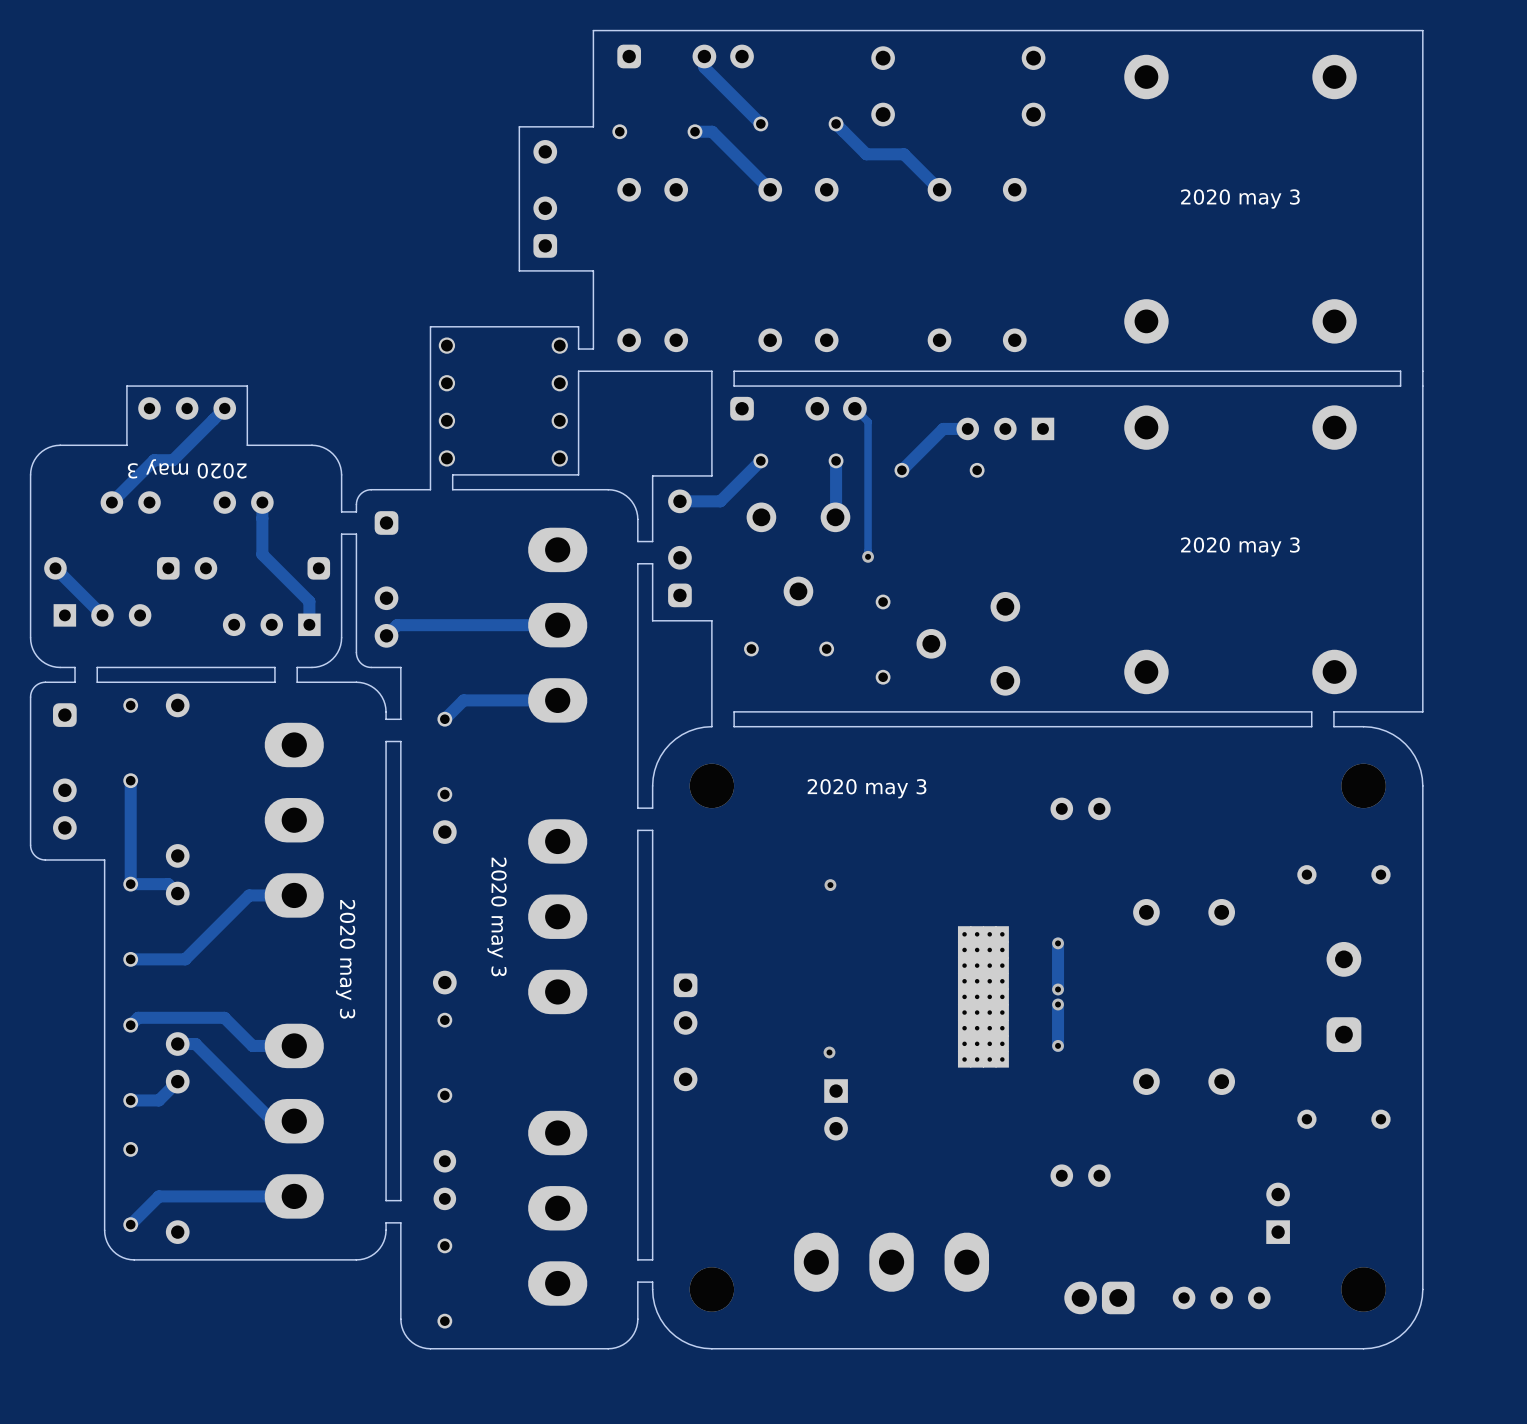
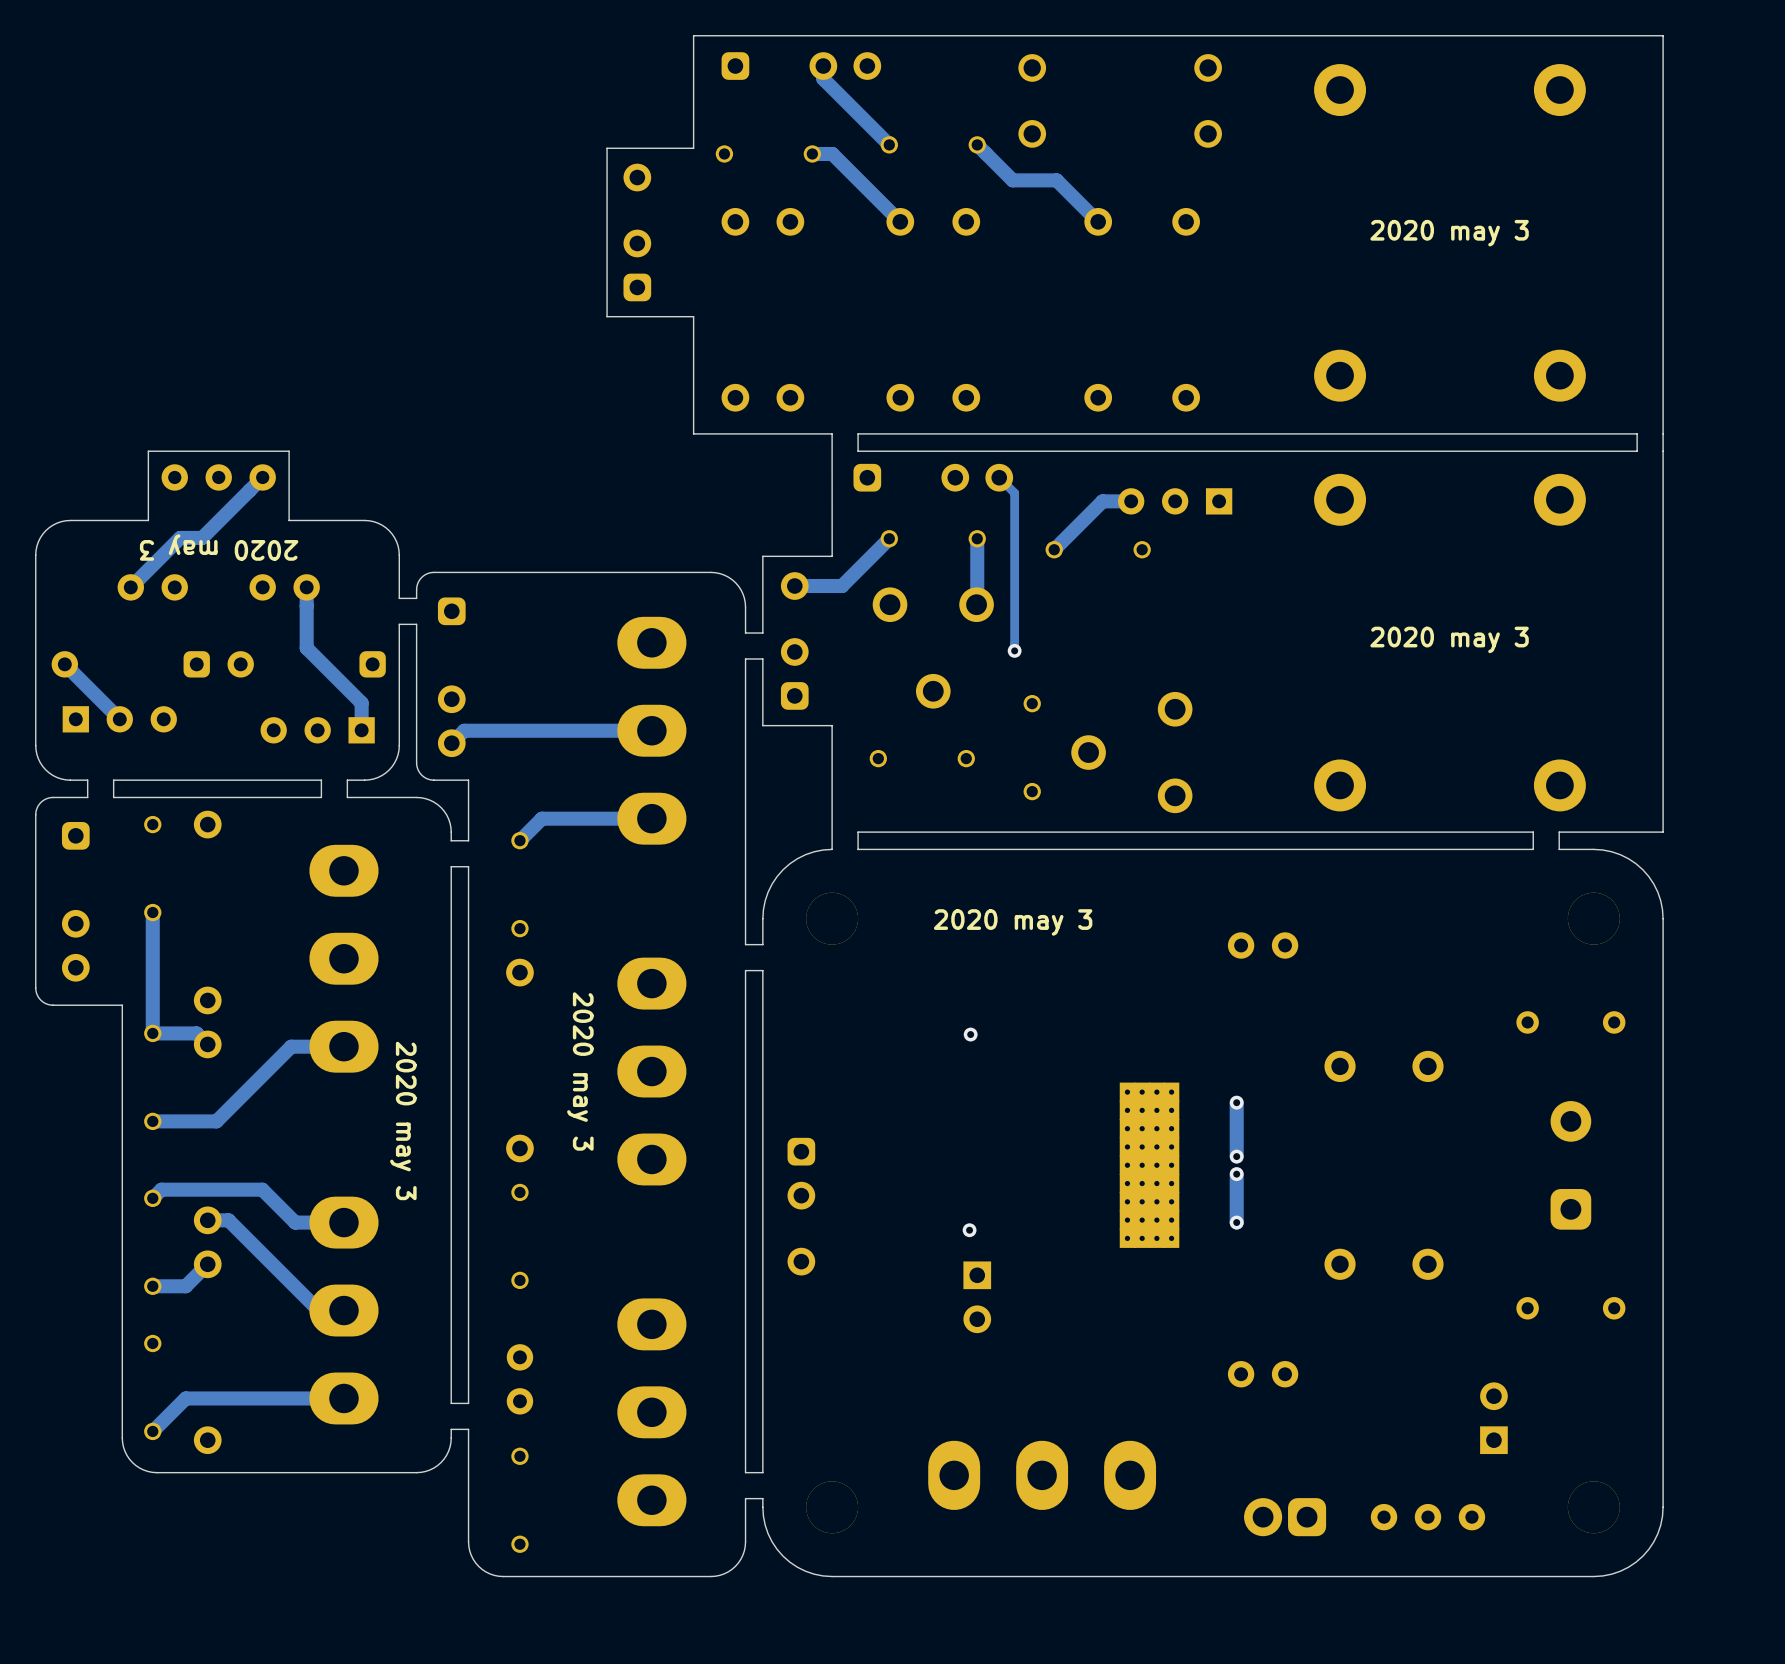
board edge: (593, 349) (578, 349) (578, 326) (430, 326) (430, 489) -> (529, 572) (503, 572)
board edge: (593, 371) (578, 371) (578, 474) (452, 474) (452, 489) -> (693, 433) (693, 407)
part: (446, 402) -> none
part: (559, 402) -> none

